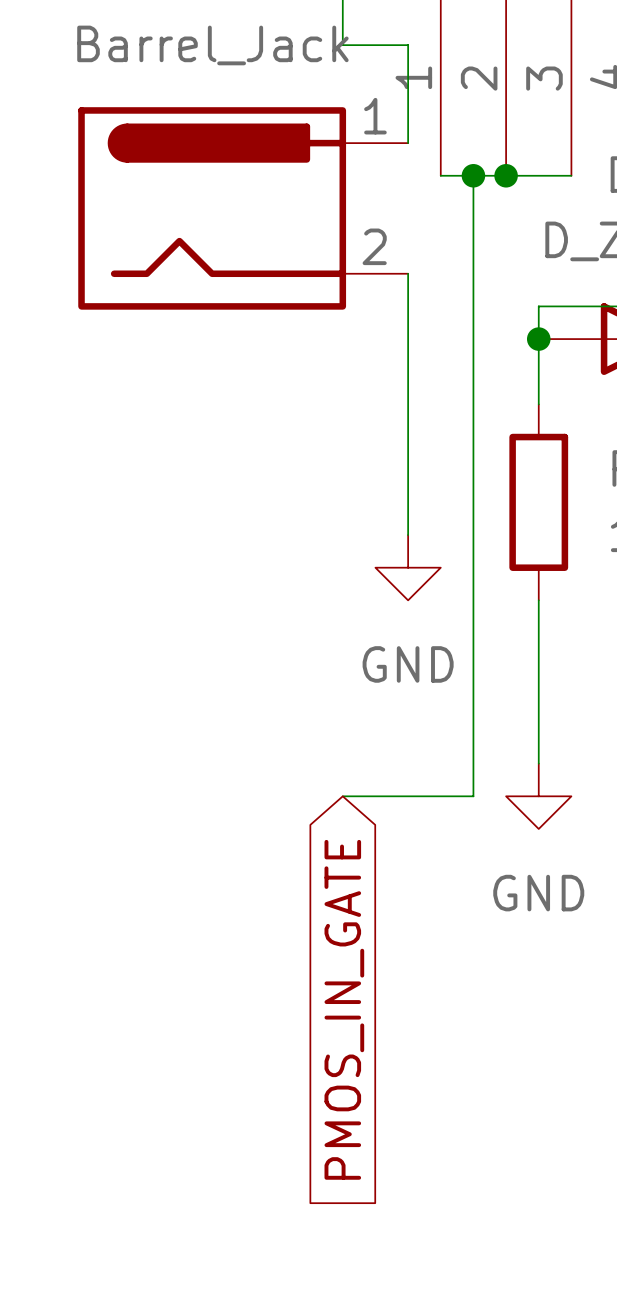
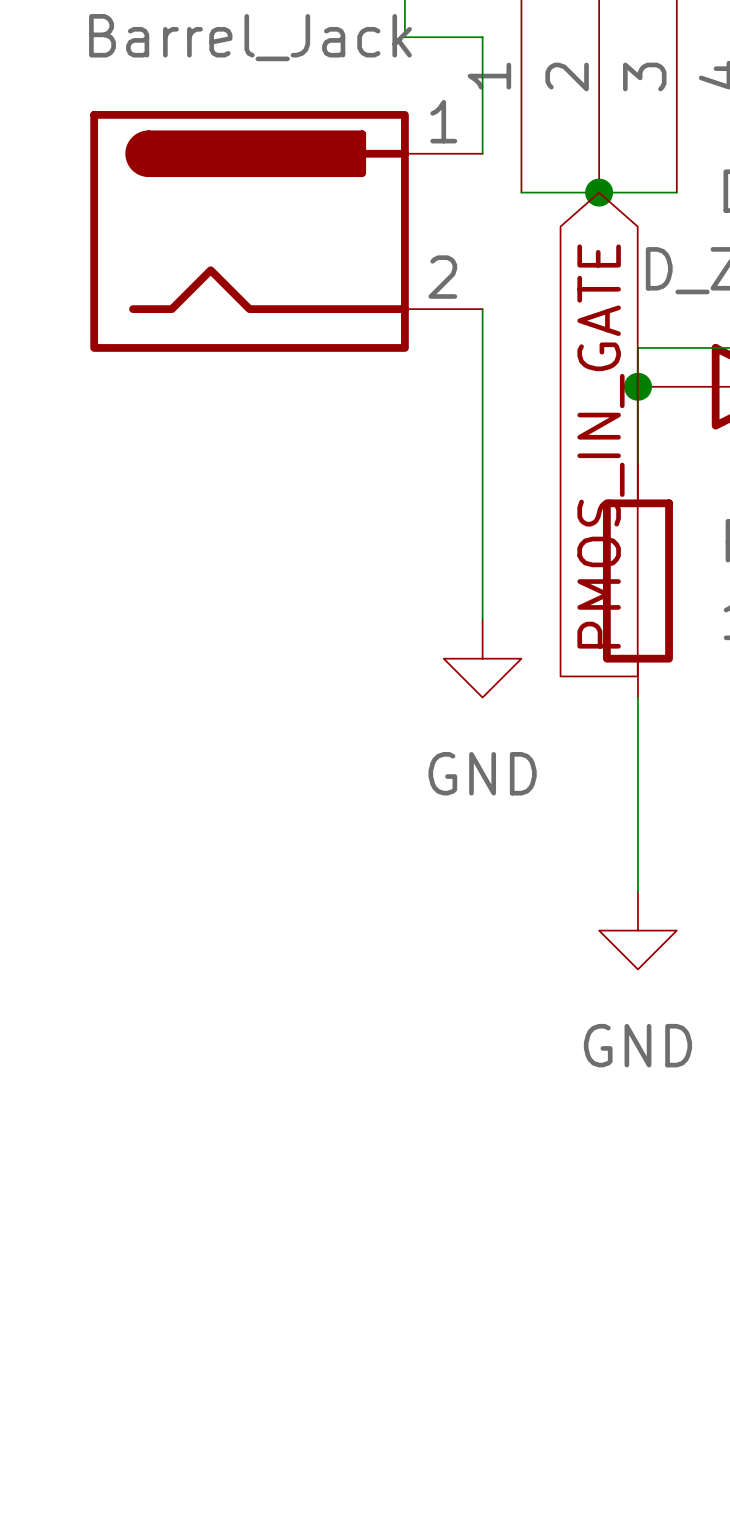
wire: (473, 175) (473, 796) (342, 796) -> none
junction: (473, 175) -> none
global label: none -> PMOS_IN_GATE (600, 446)
global label: PMOS_IN_GATE (344, 1009) -> none

